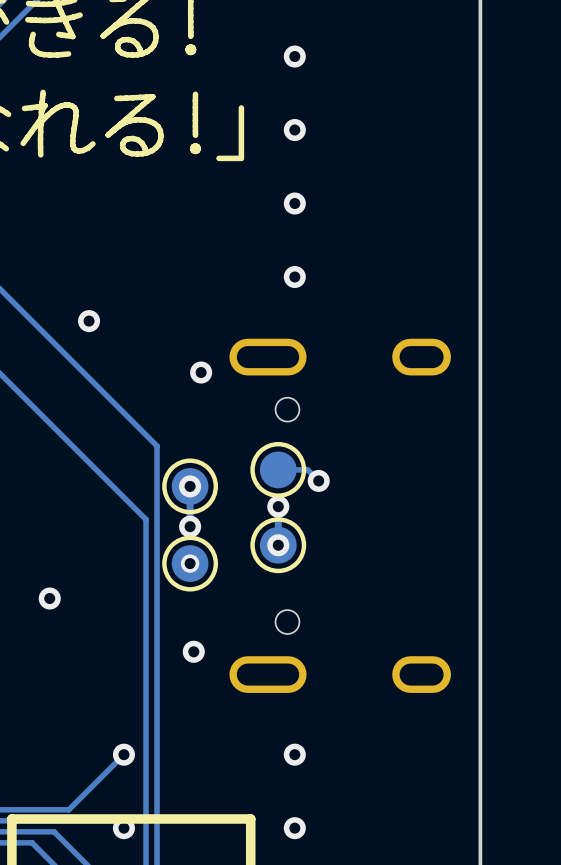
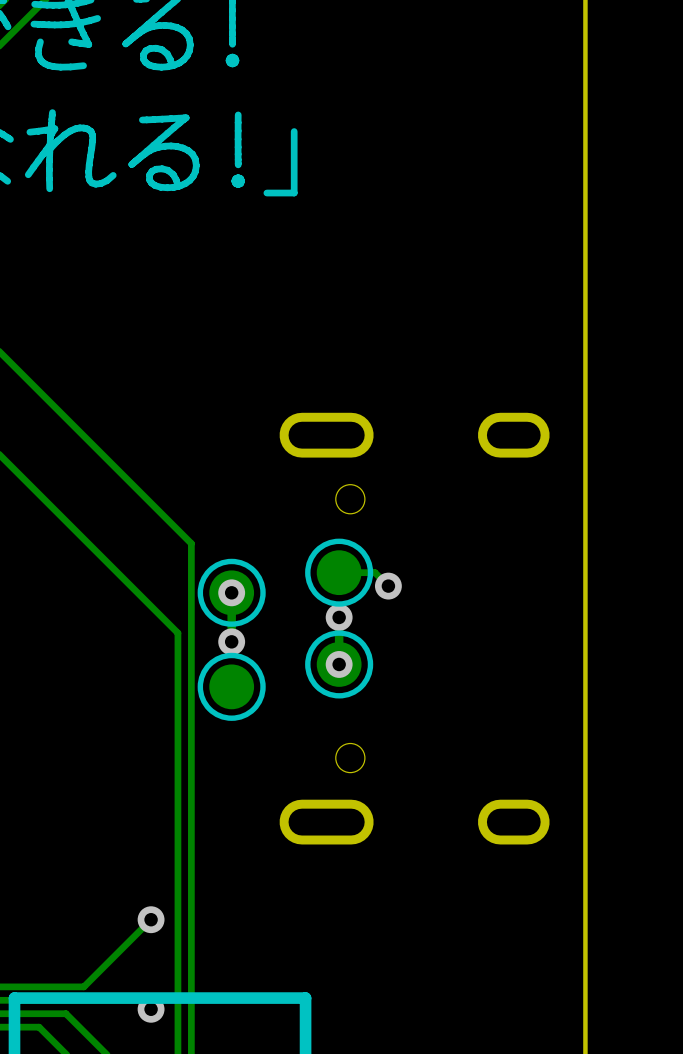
via: (294, 56) -> none
via: (294, 130) -> none
via: (294, 203) -> none
via: (294, 276) -> none
via: (89, 321) -> none
via: (201, 372) -> none
via: (190, 563) -> none
via: (49, 598) -> none
via: (193, 651) -> none
via: (294, 754) -> none
via: (294, 828) -> none

